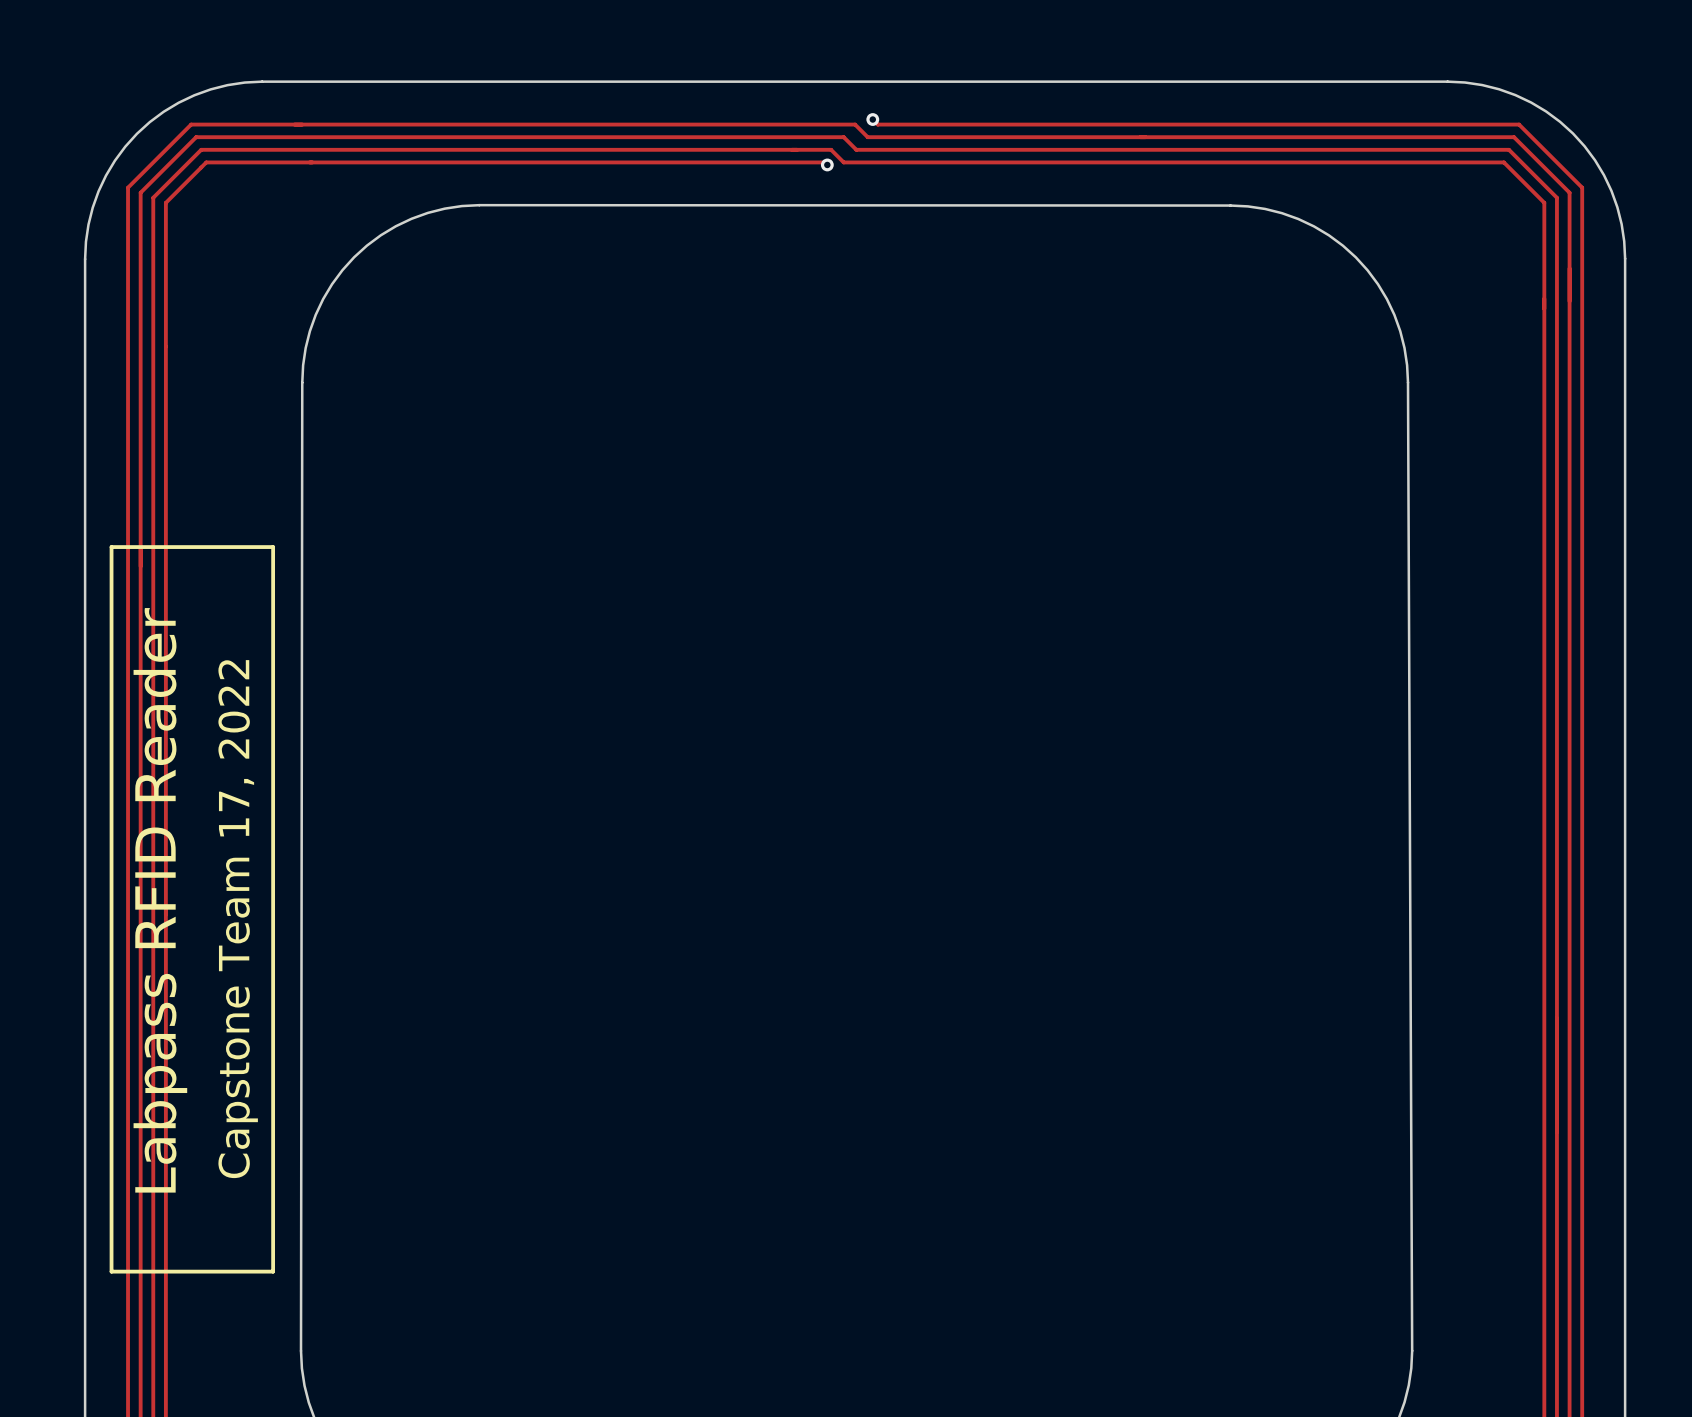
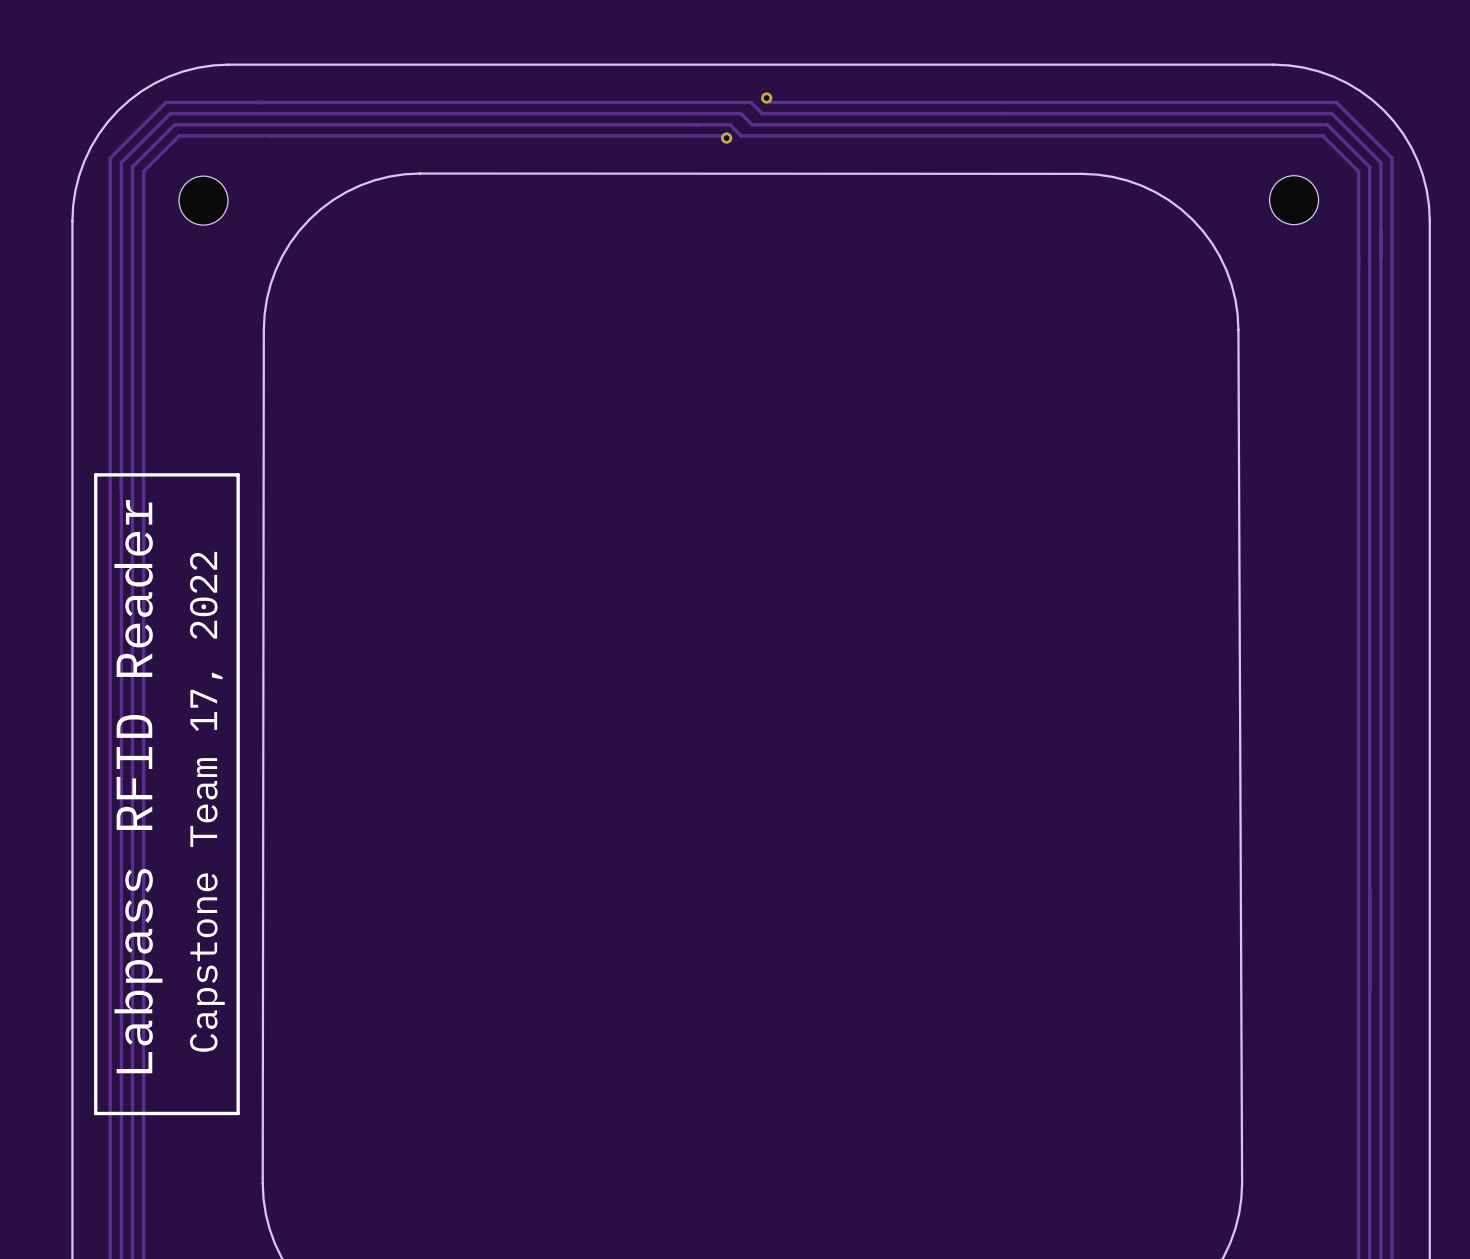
part: none -> (203, 200)
part: none -> (1294, 200)

